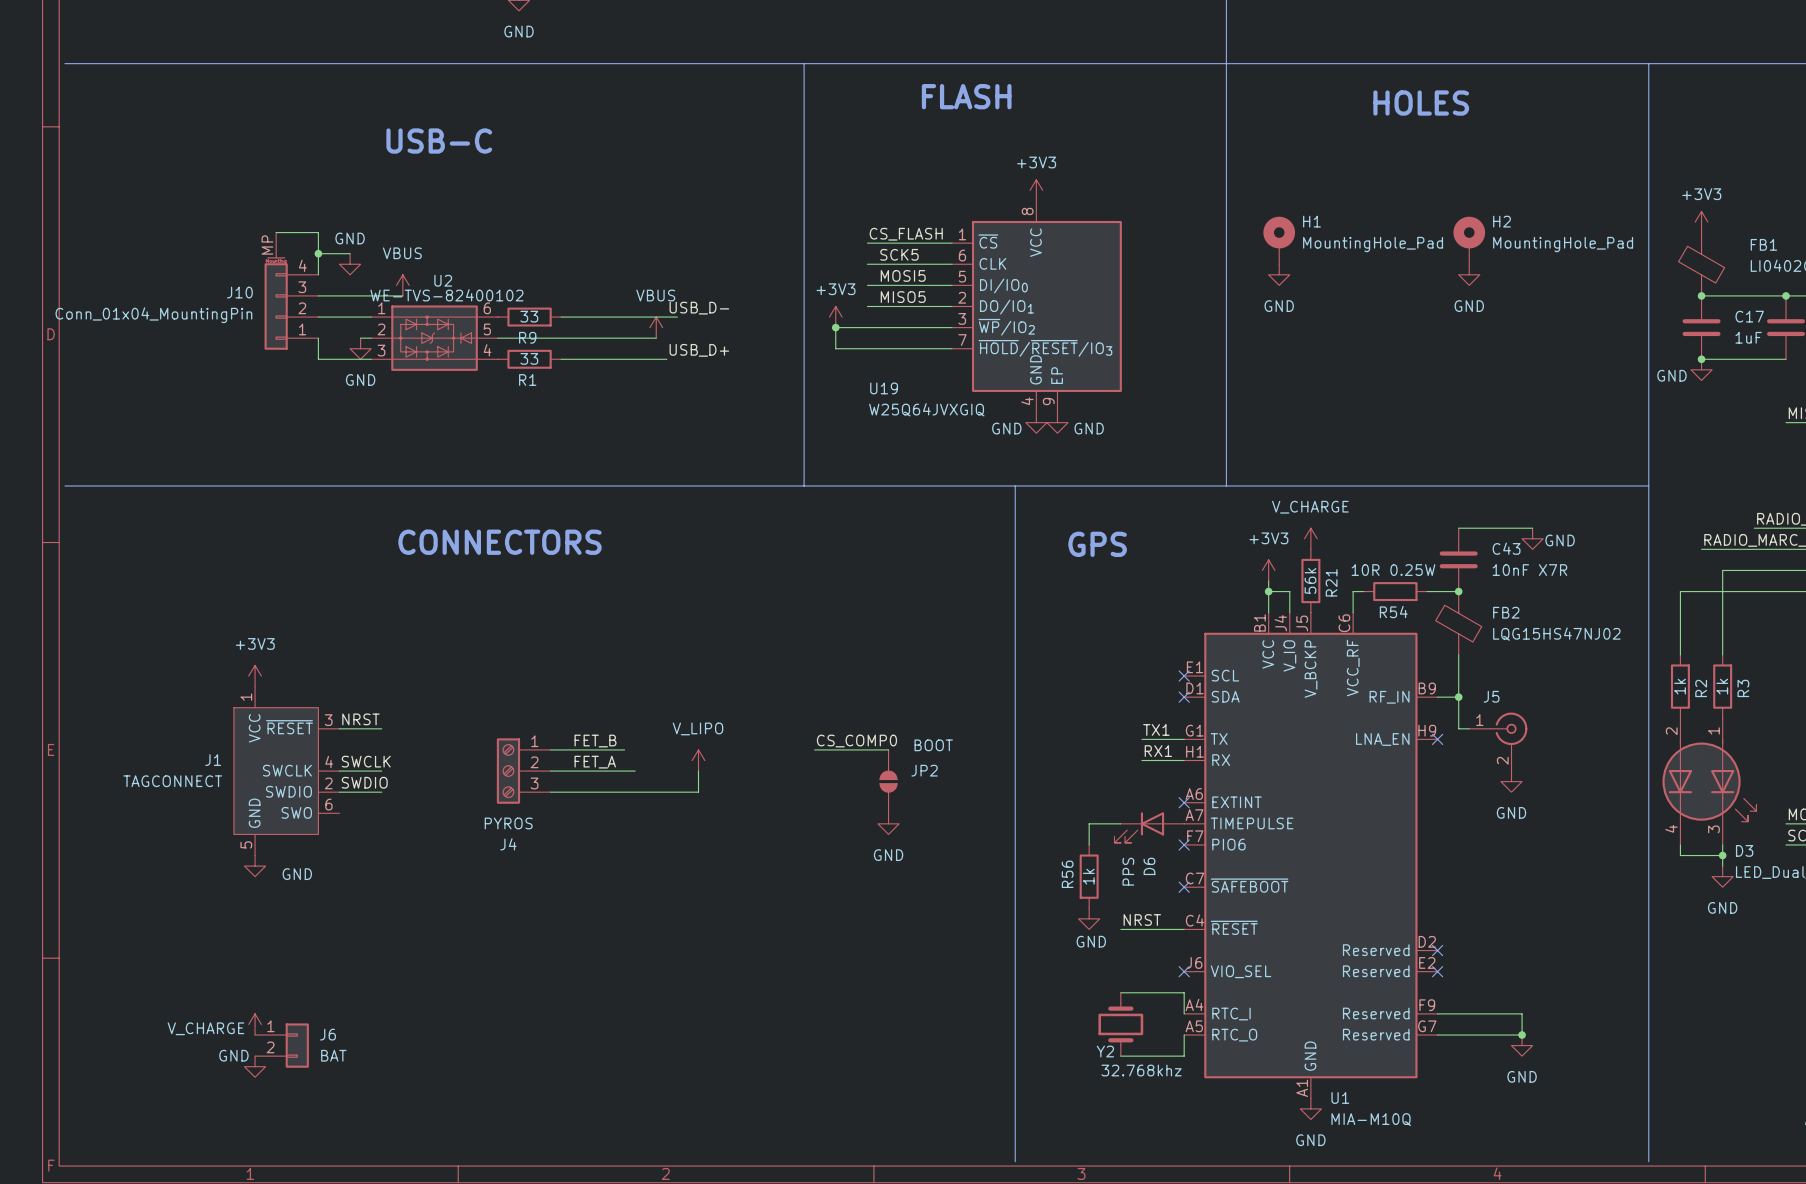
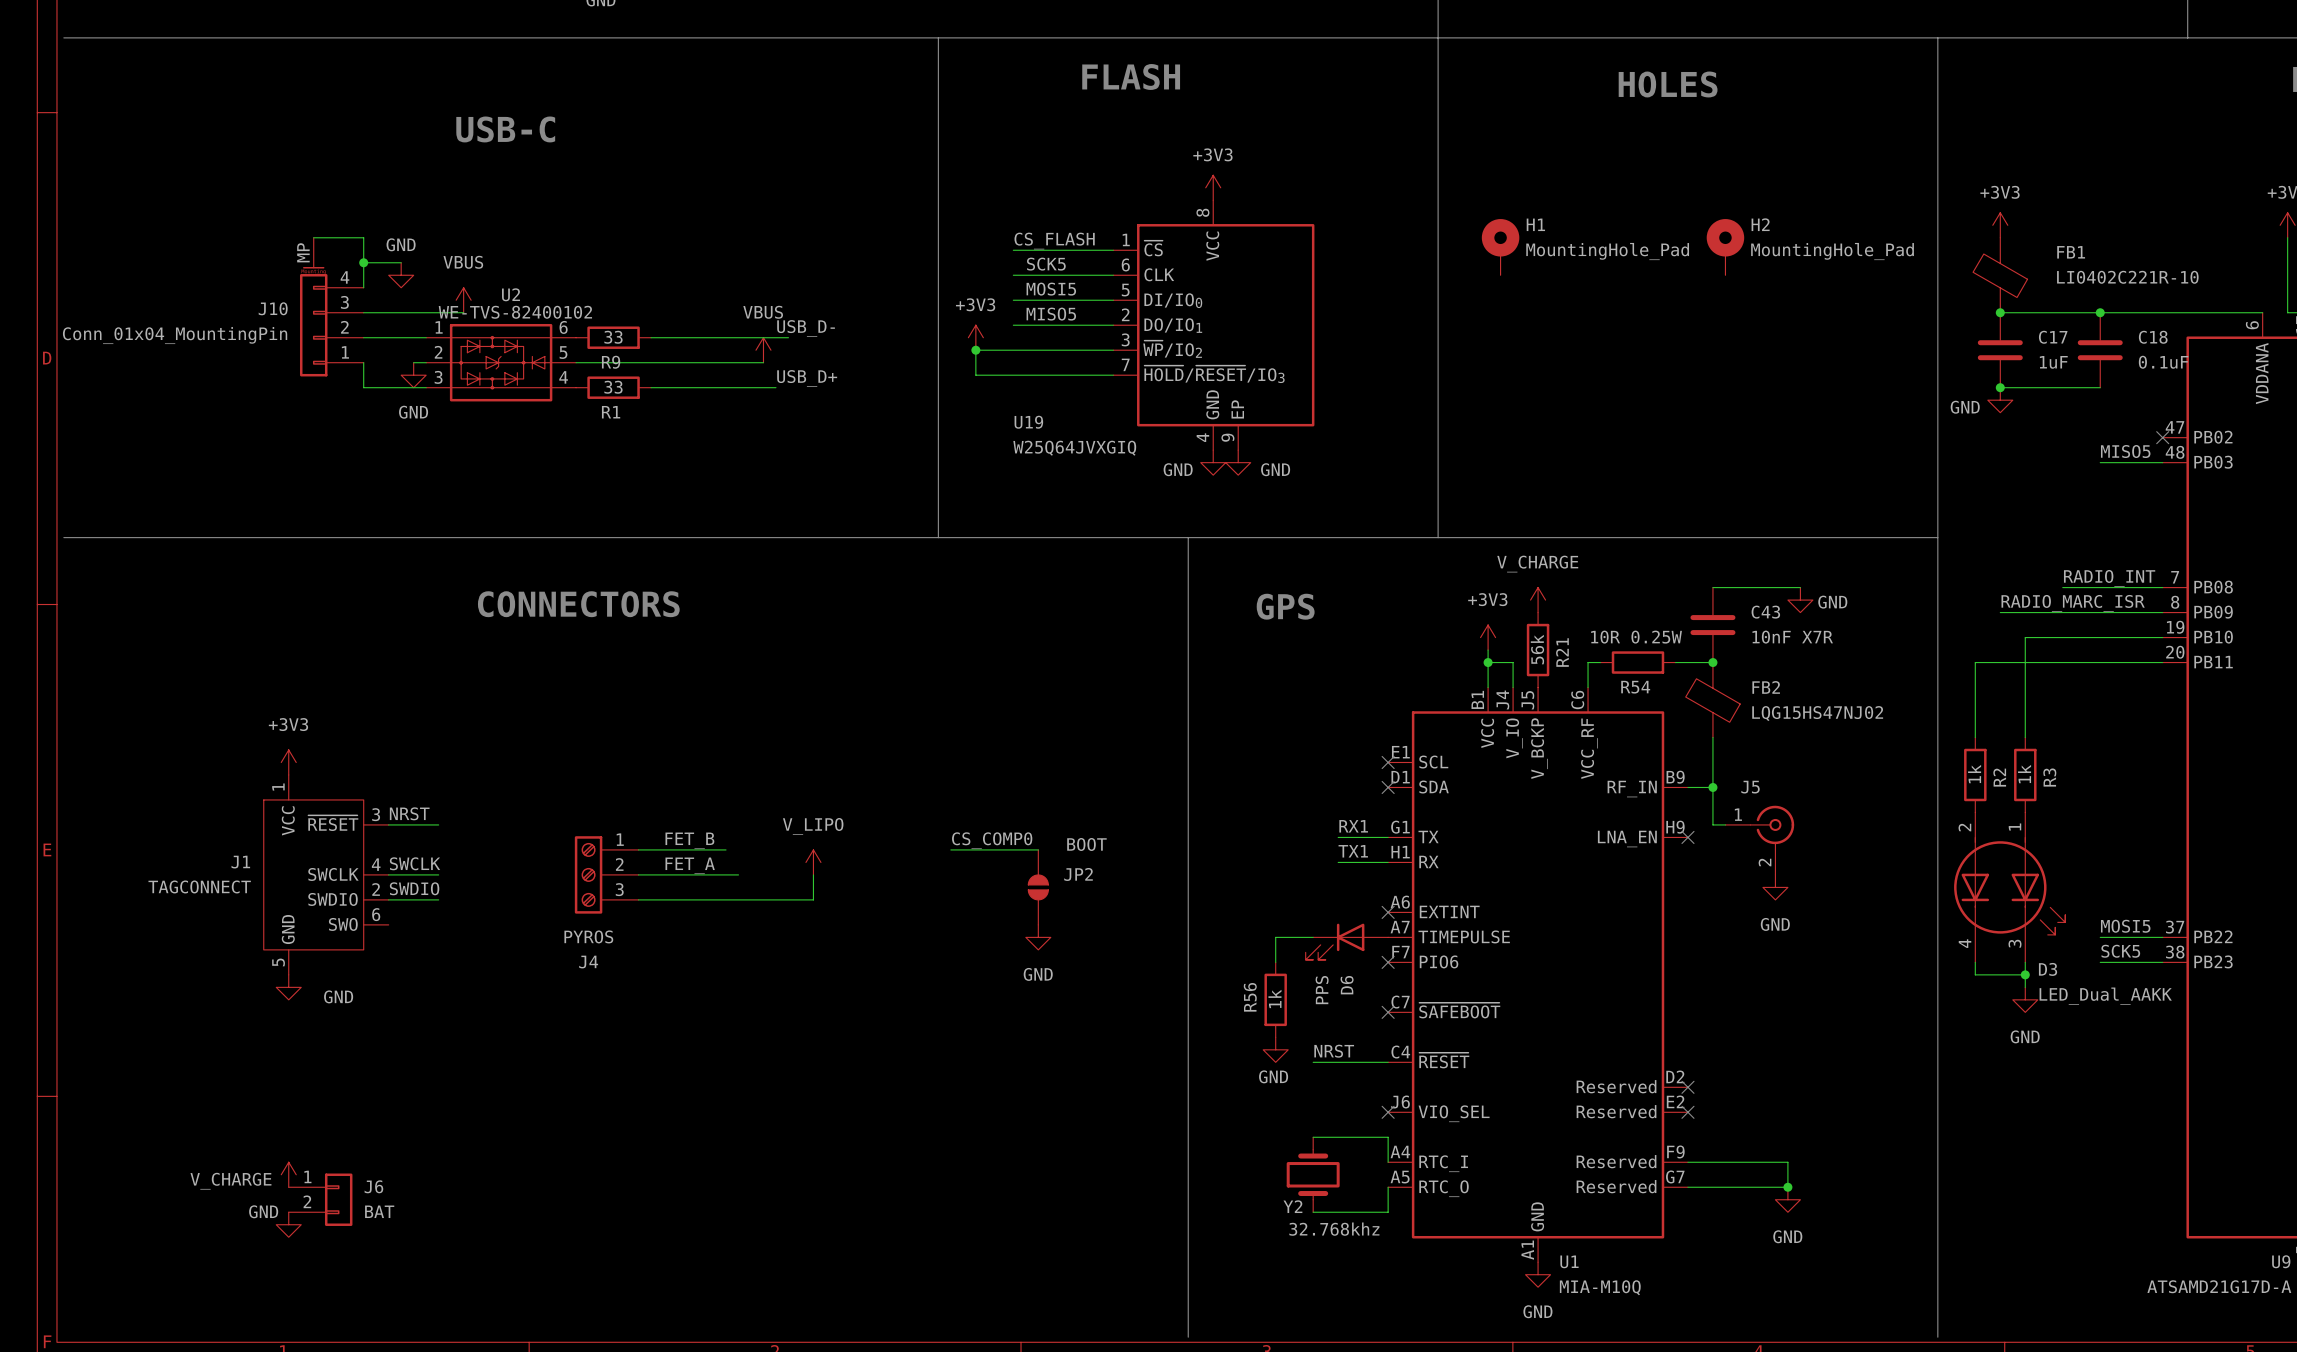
power symbol: GND (1279, 274) -> none
power symbol: GND (1469, 274) -> none
label: TX1 (1156, 729) -> RX1 (1353, 826)
label: RX1 (1158, 751) -> TX1 (1353, 851)

